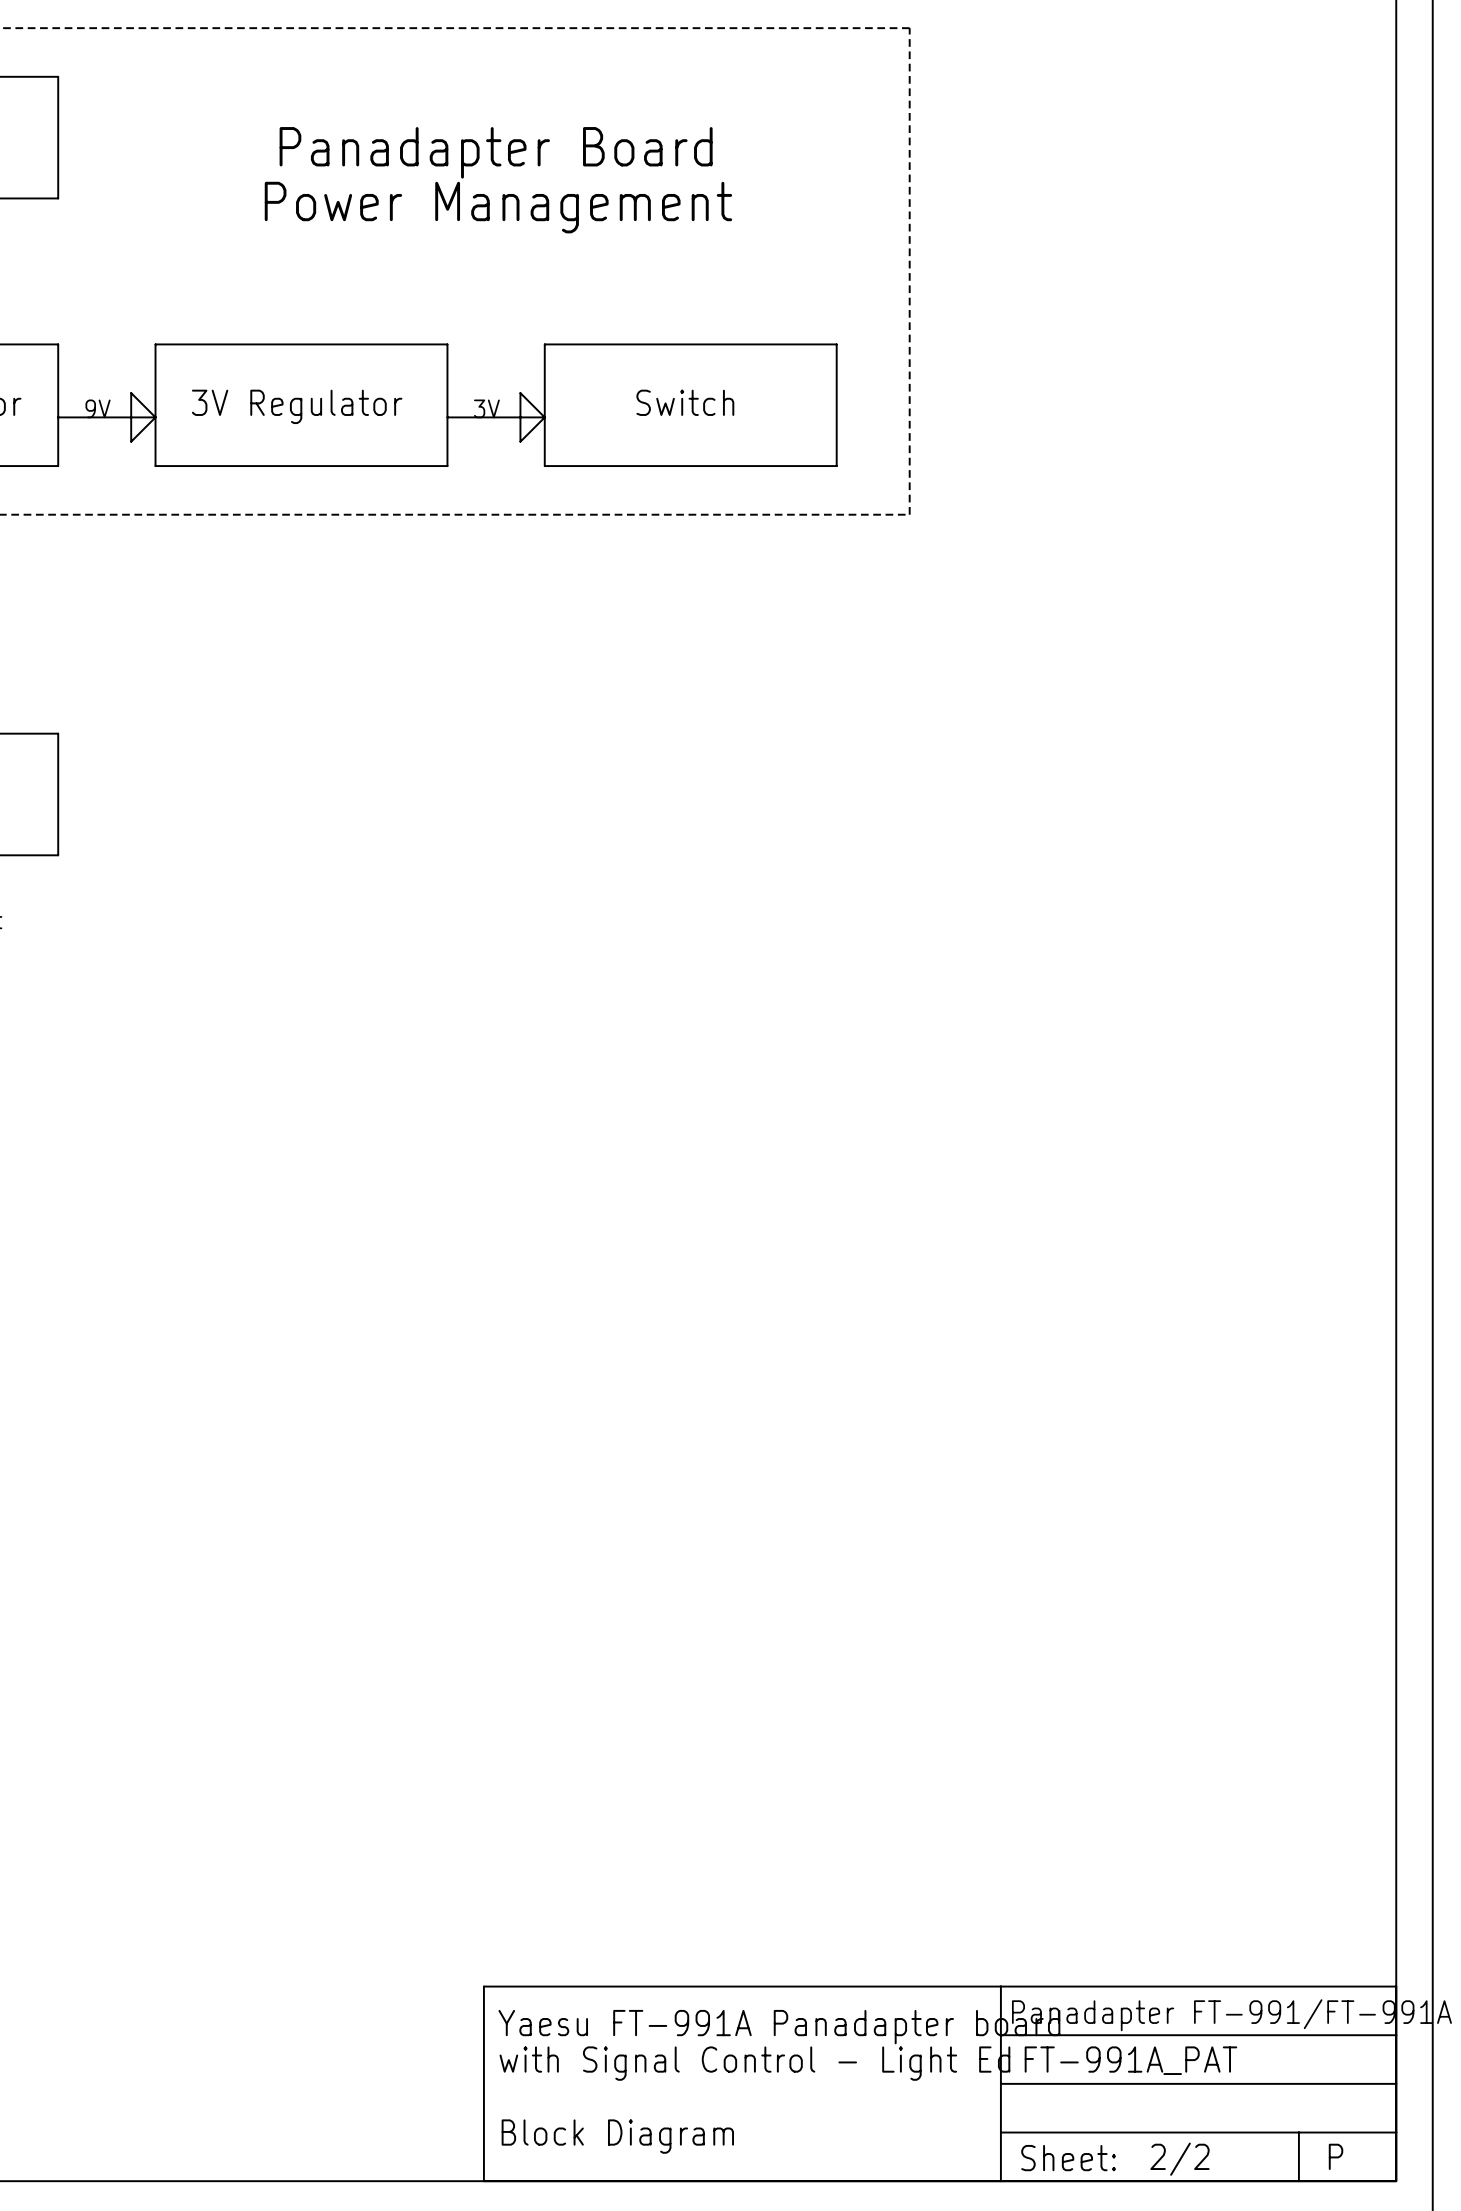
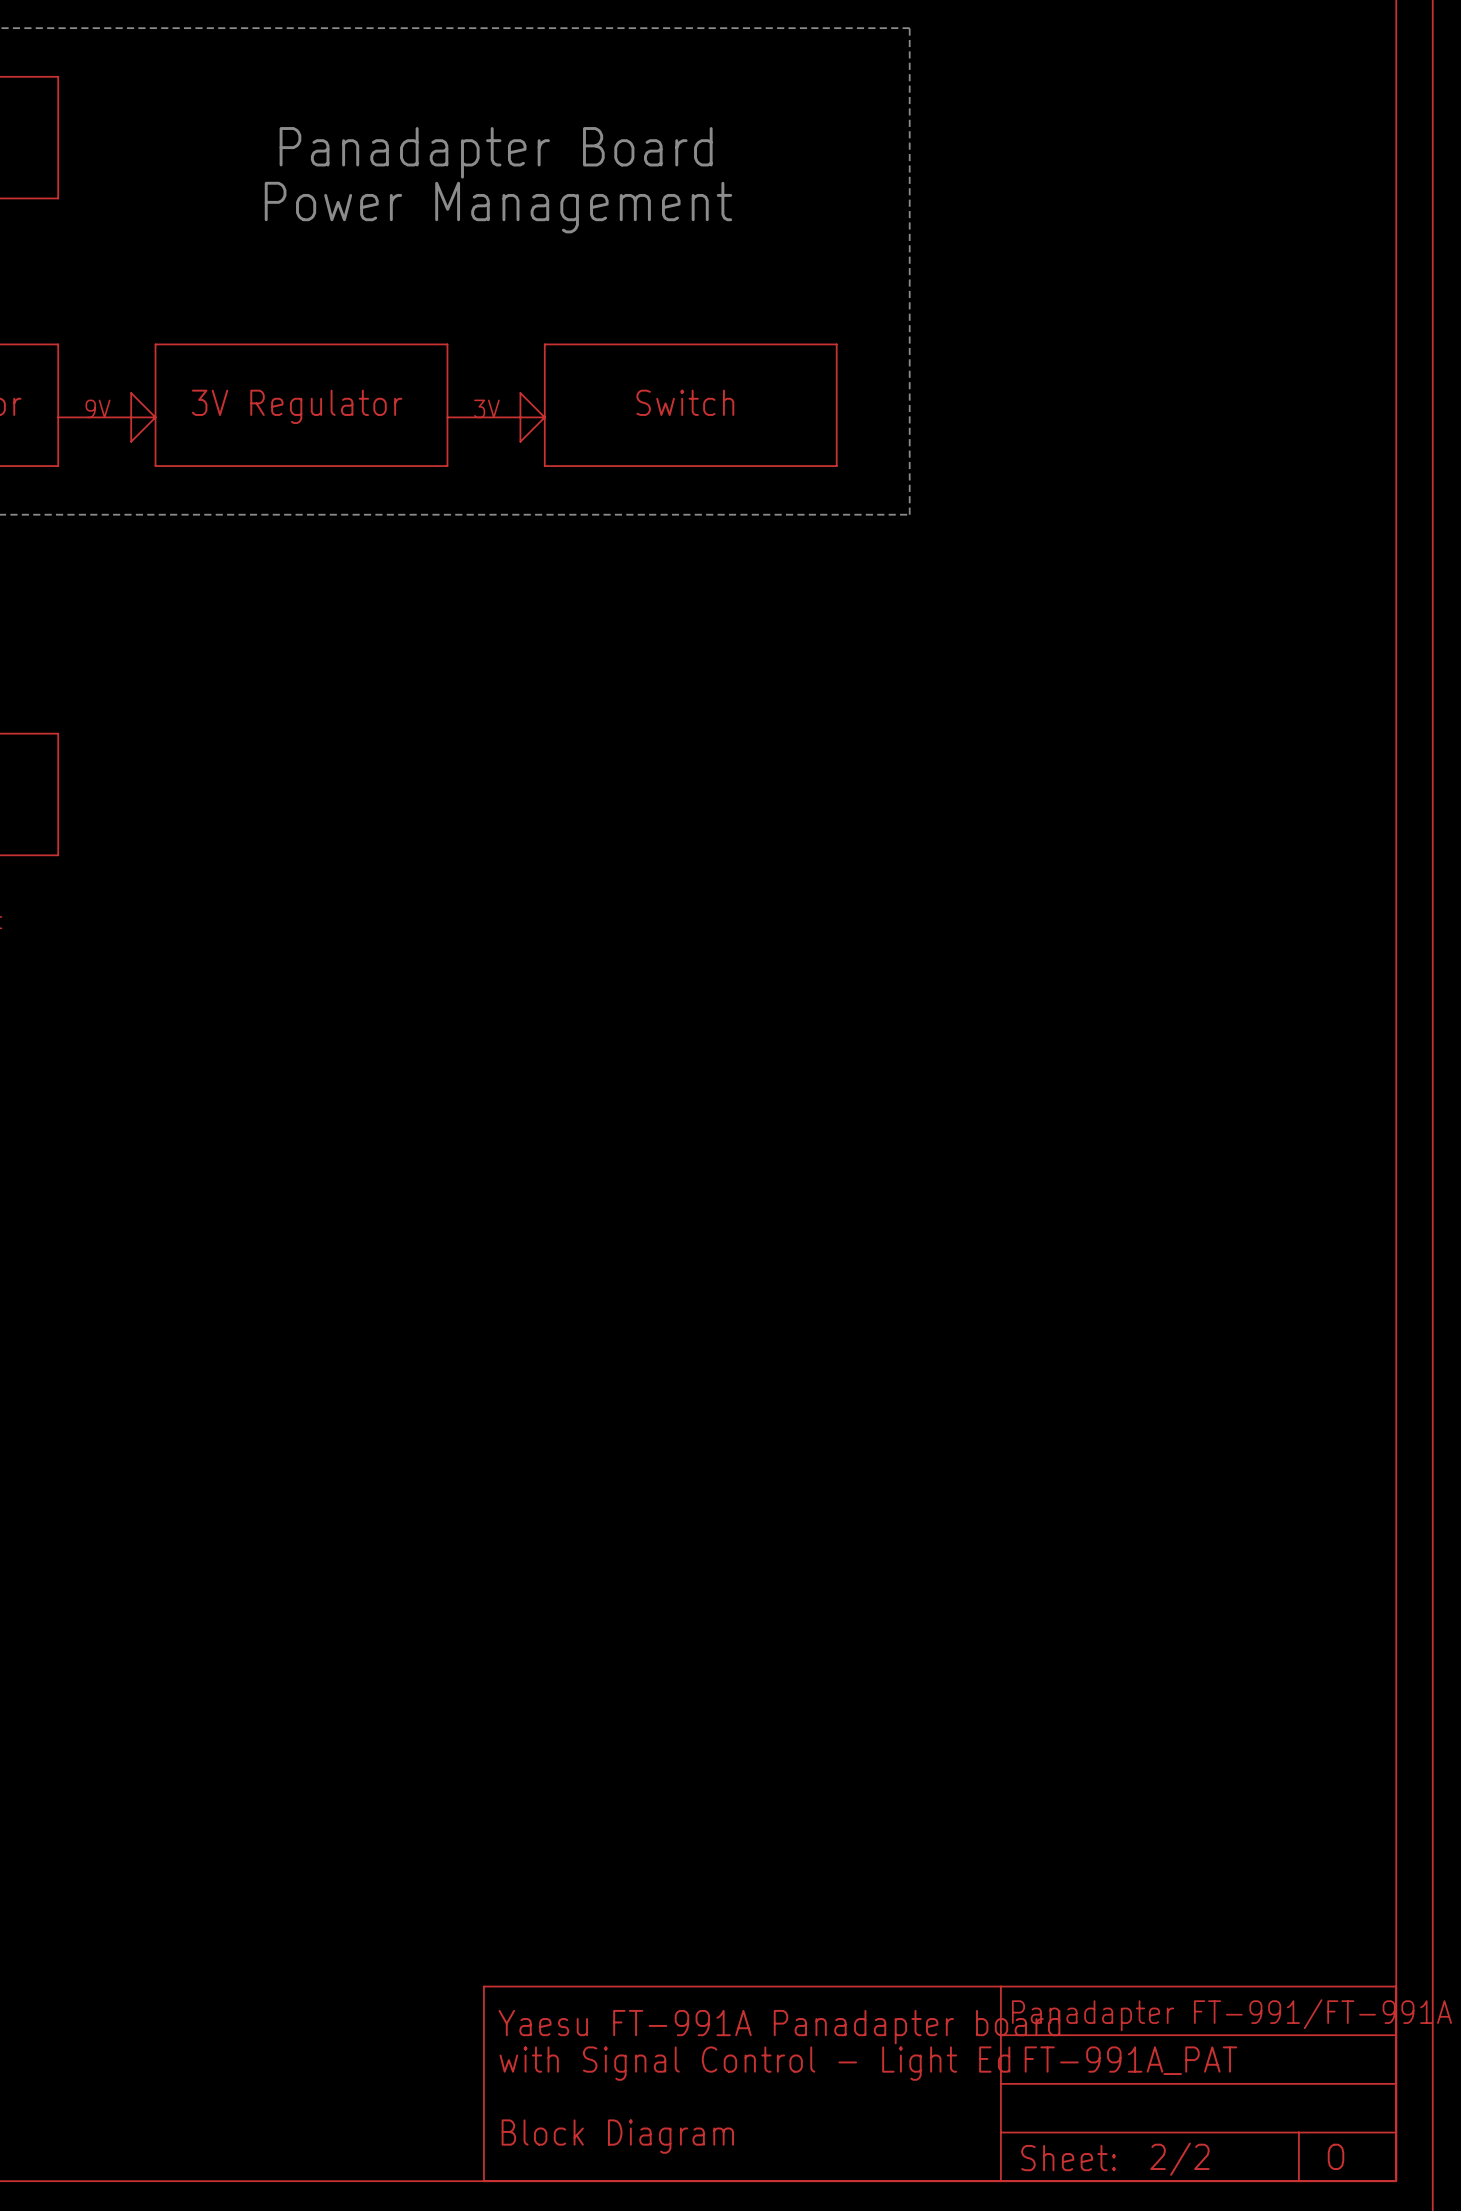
text: P (1336, 2156) -> O (1336, 2156)

